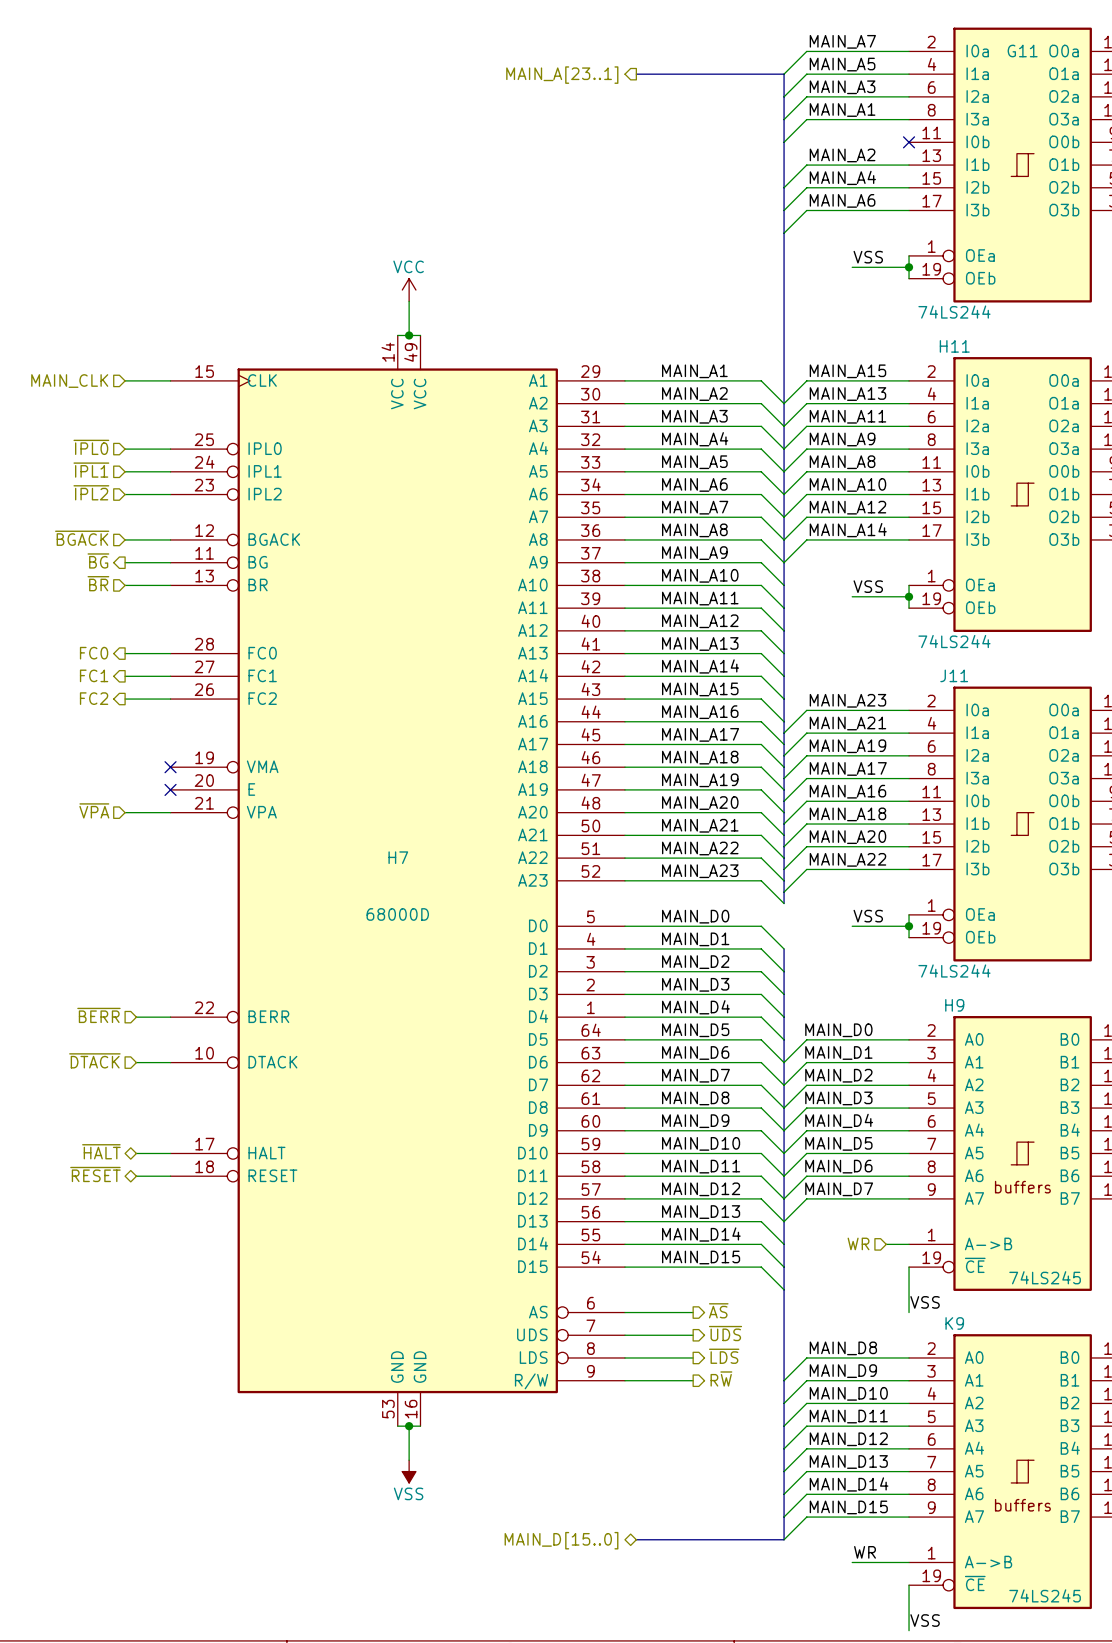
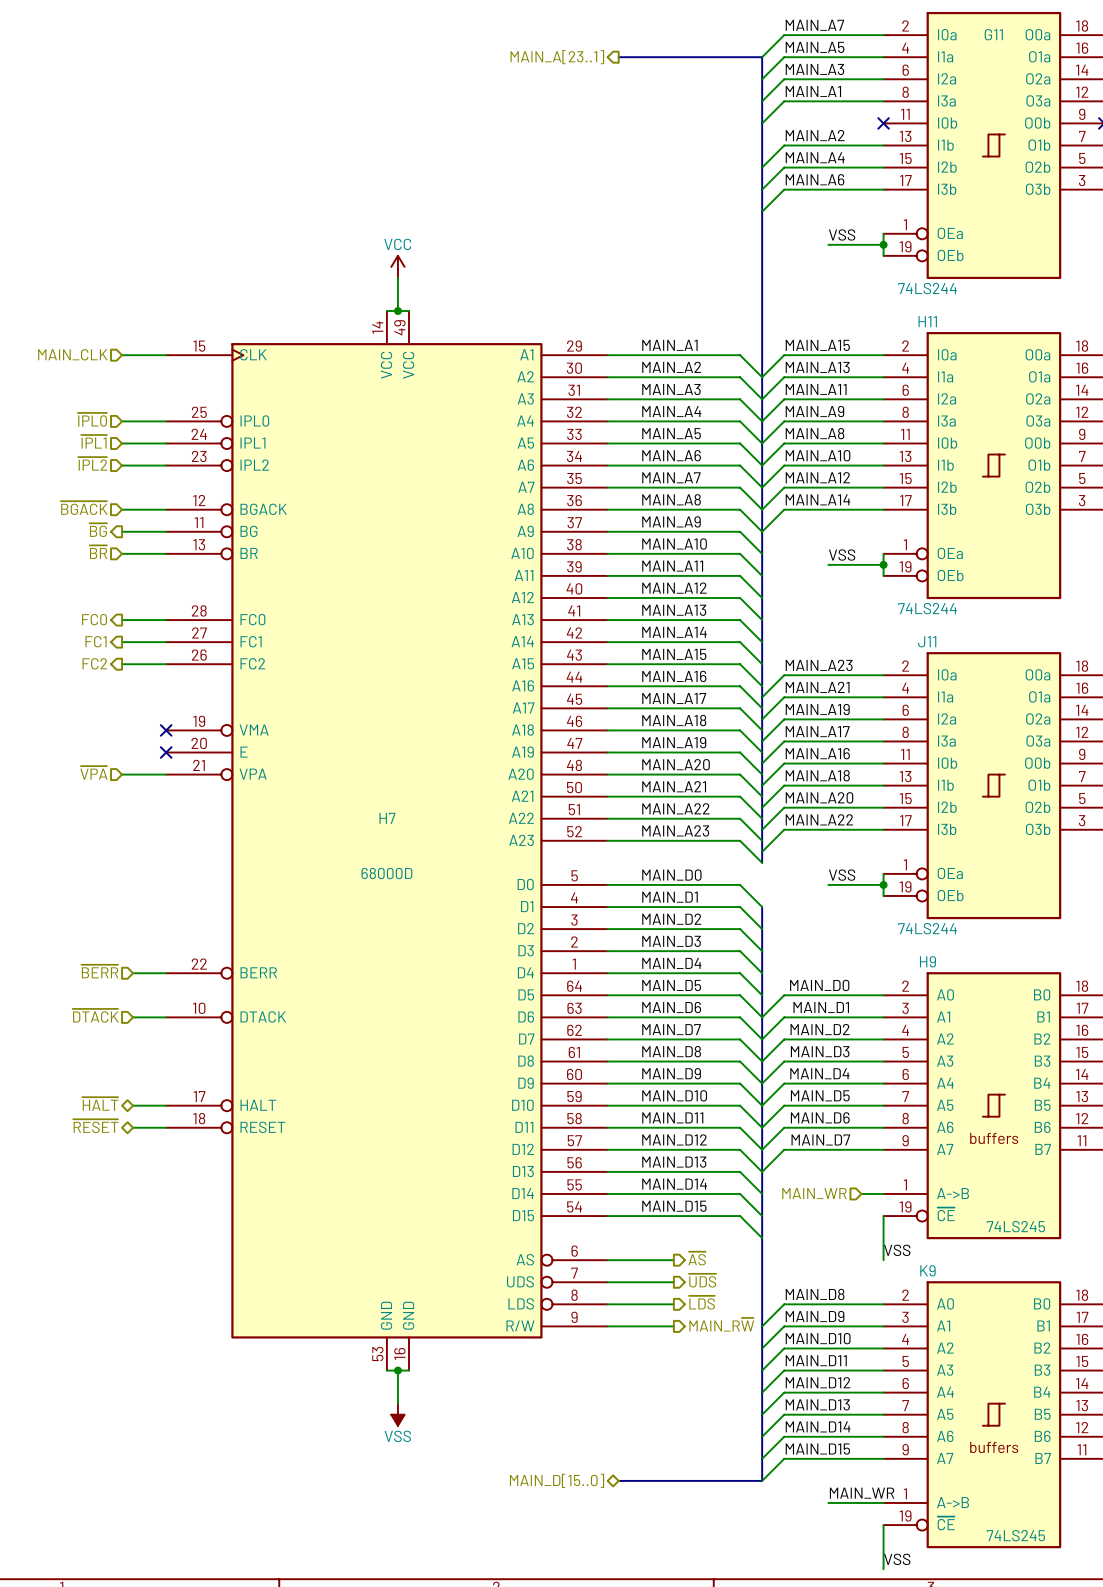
hierarchical label: WR (858, 1243) -> MAIN_WR (814, 1193)
hierarchical label: R~{W} (721, 1378) -> MAIN_R~{W} (721, 1324)
label: WR (865, 1552) -> MAIN_WR (862, 1493)

